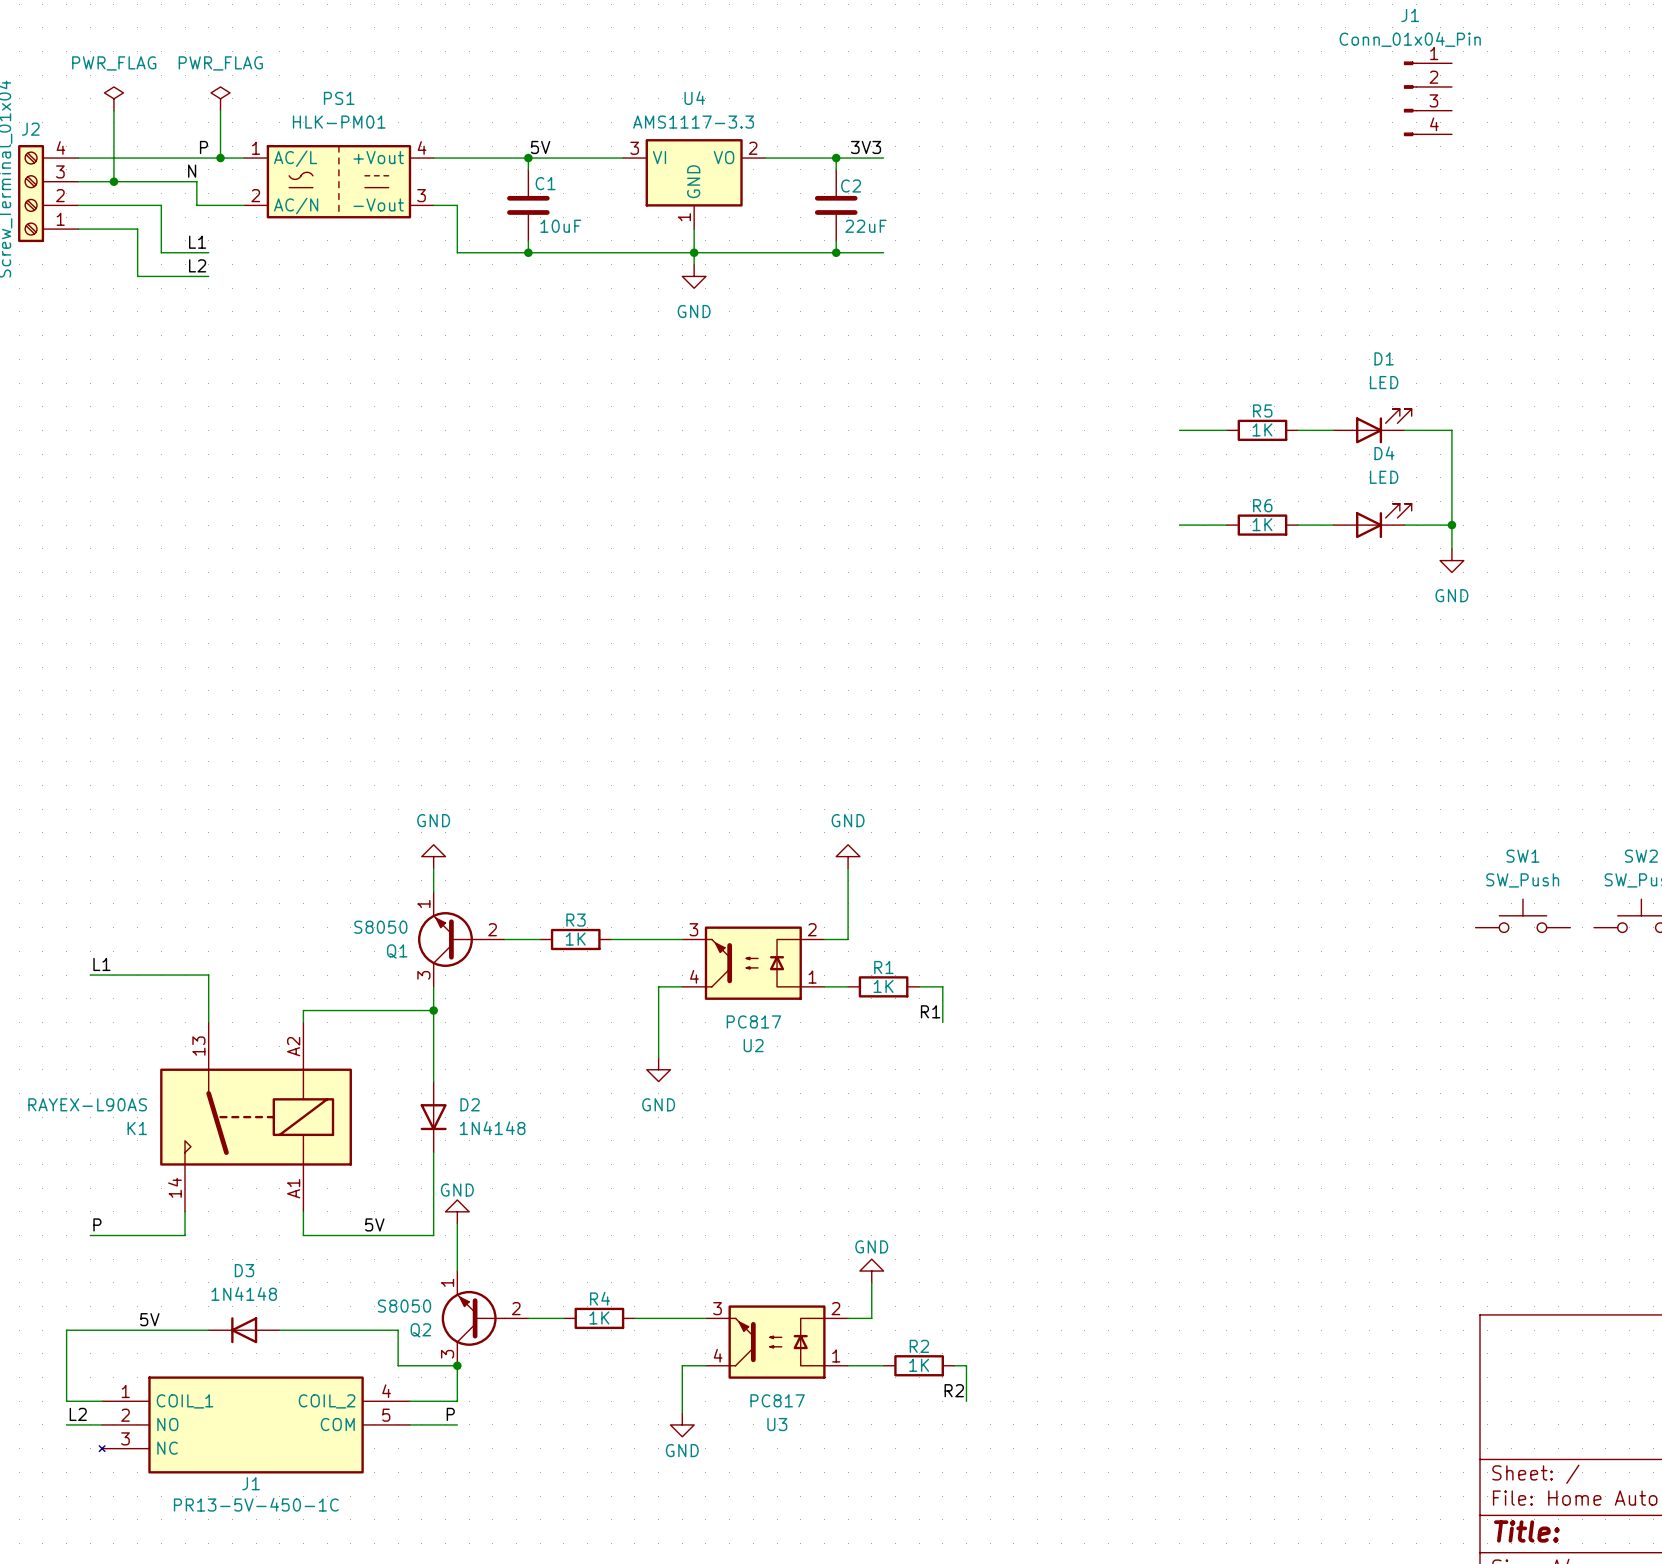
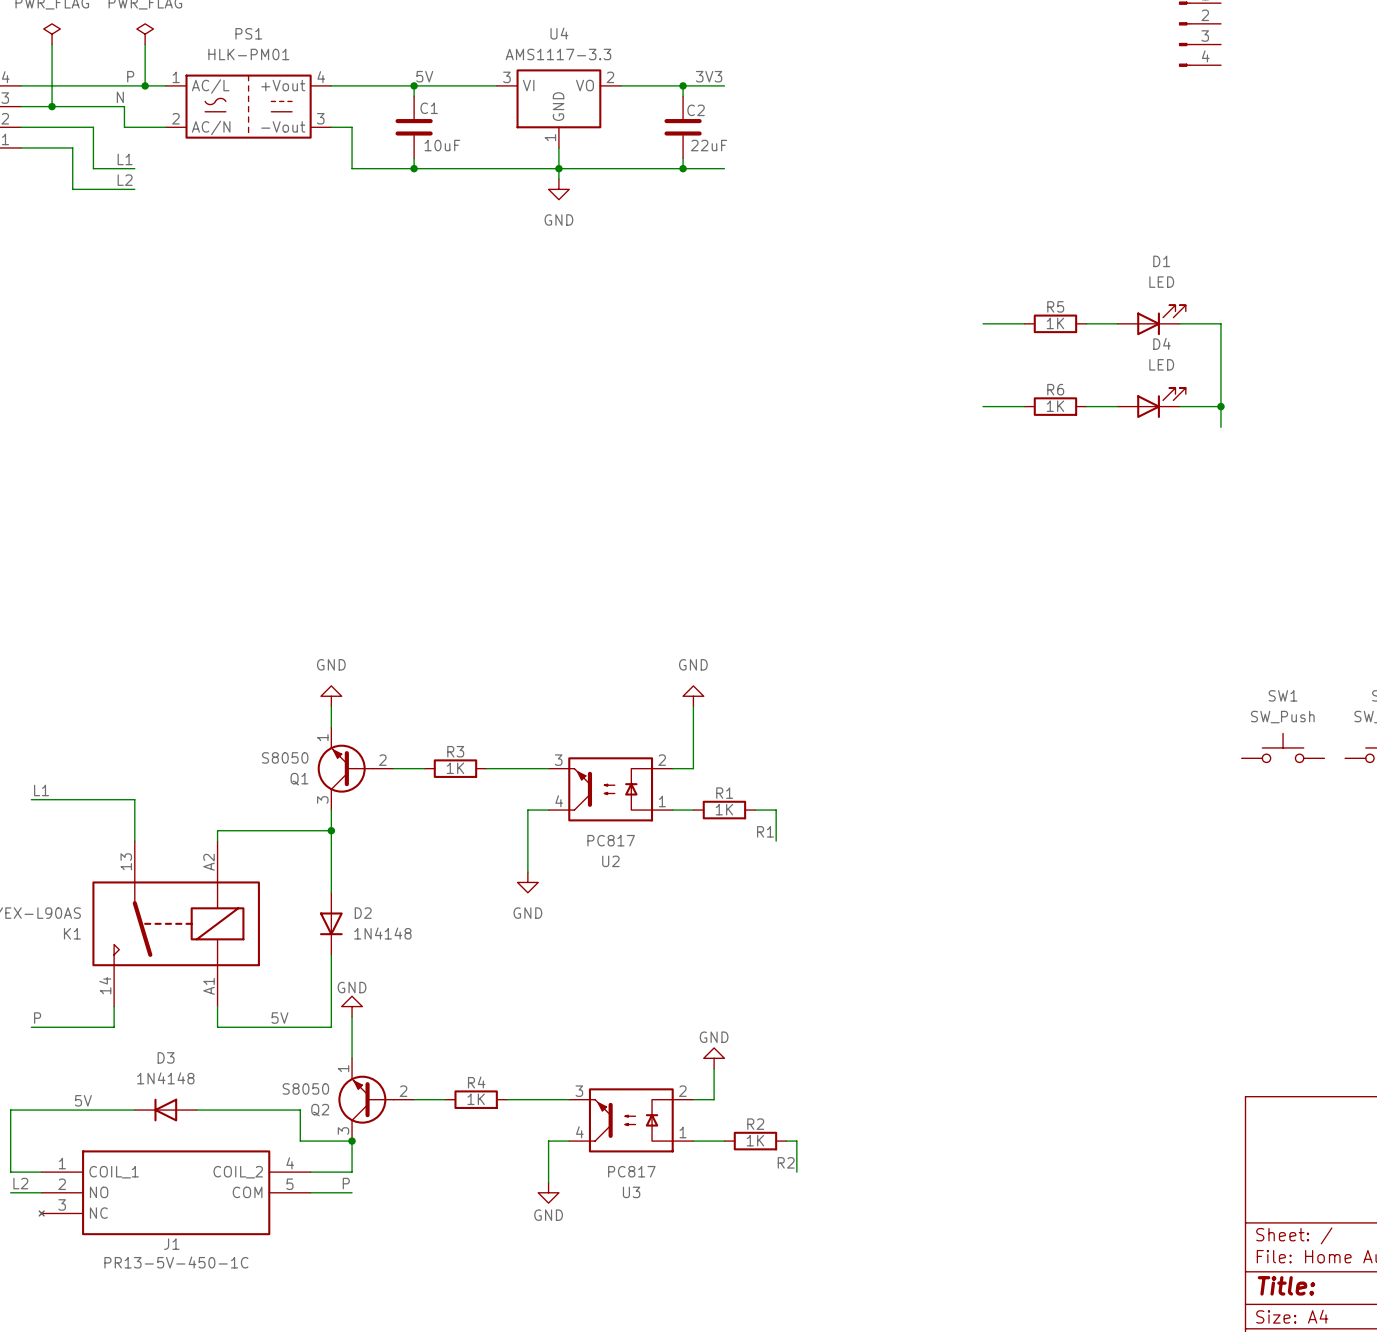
power symbol: GND (1451, 560) -> none

